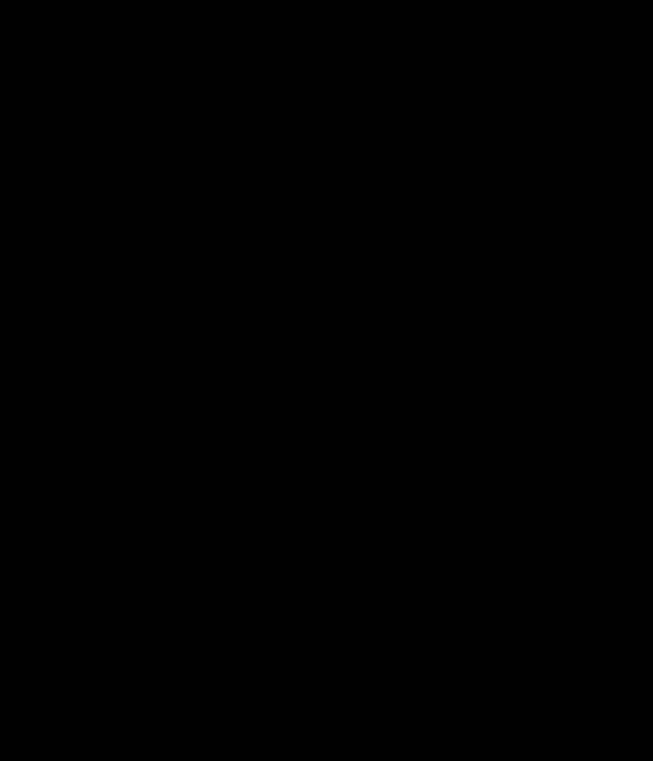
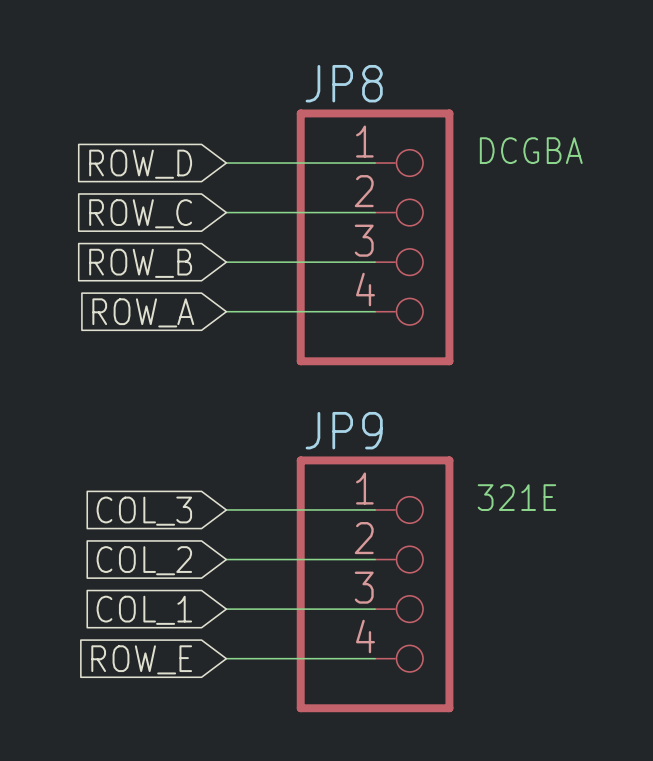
text: none -> DCGBA (531, 150)
wire: none -> (226, 163) (375, 163)
global label: none -> ROW_D (140, 164)
wire: none -> (226, 212) (375, 212)
global label: none -> ROW_C (140, 213)
JP8: none -> (375, 237)
wire: none -> (226, 262) (375, 262)
global label: none -> ROW_B (140, 263)
wire: none -> (226, 311) (375, 311)
global label: none -> ROW_A (143, 312)
text: none -> 321E (516, 497)
wire: none -> (226, 509) (375, 509)
global label: none -> COL_3 (144, 511)
wire: none -> (226, 559) (375, 559)
global label: none -> COL_2 (144, 560)
JP9: none -> (375, 584)
wire: none -> (226, 609) (375, 609)
global label: none -> COL_1 (144, 610)
wire: none -> (226, 658) (375, 658)
global label: none -> ROW_E (141, 659)

